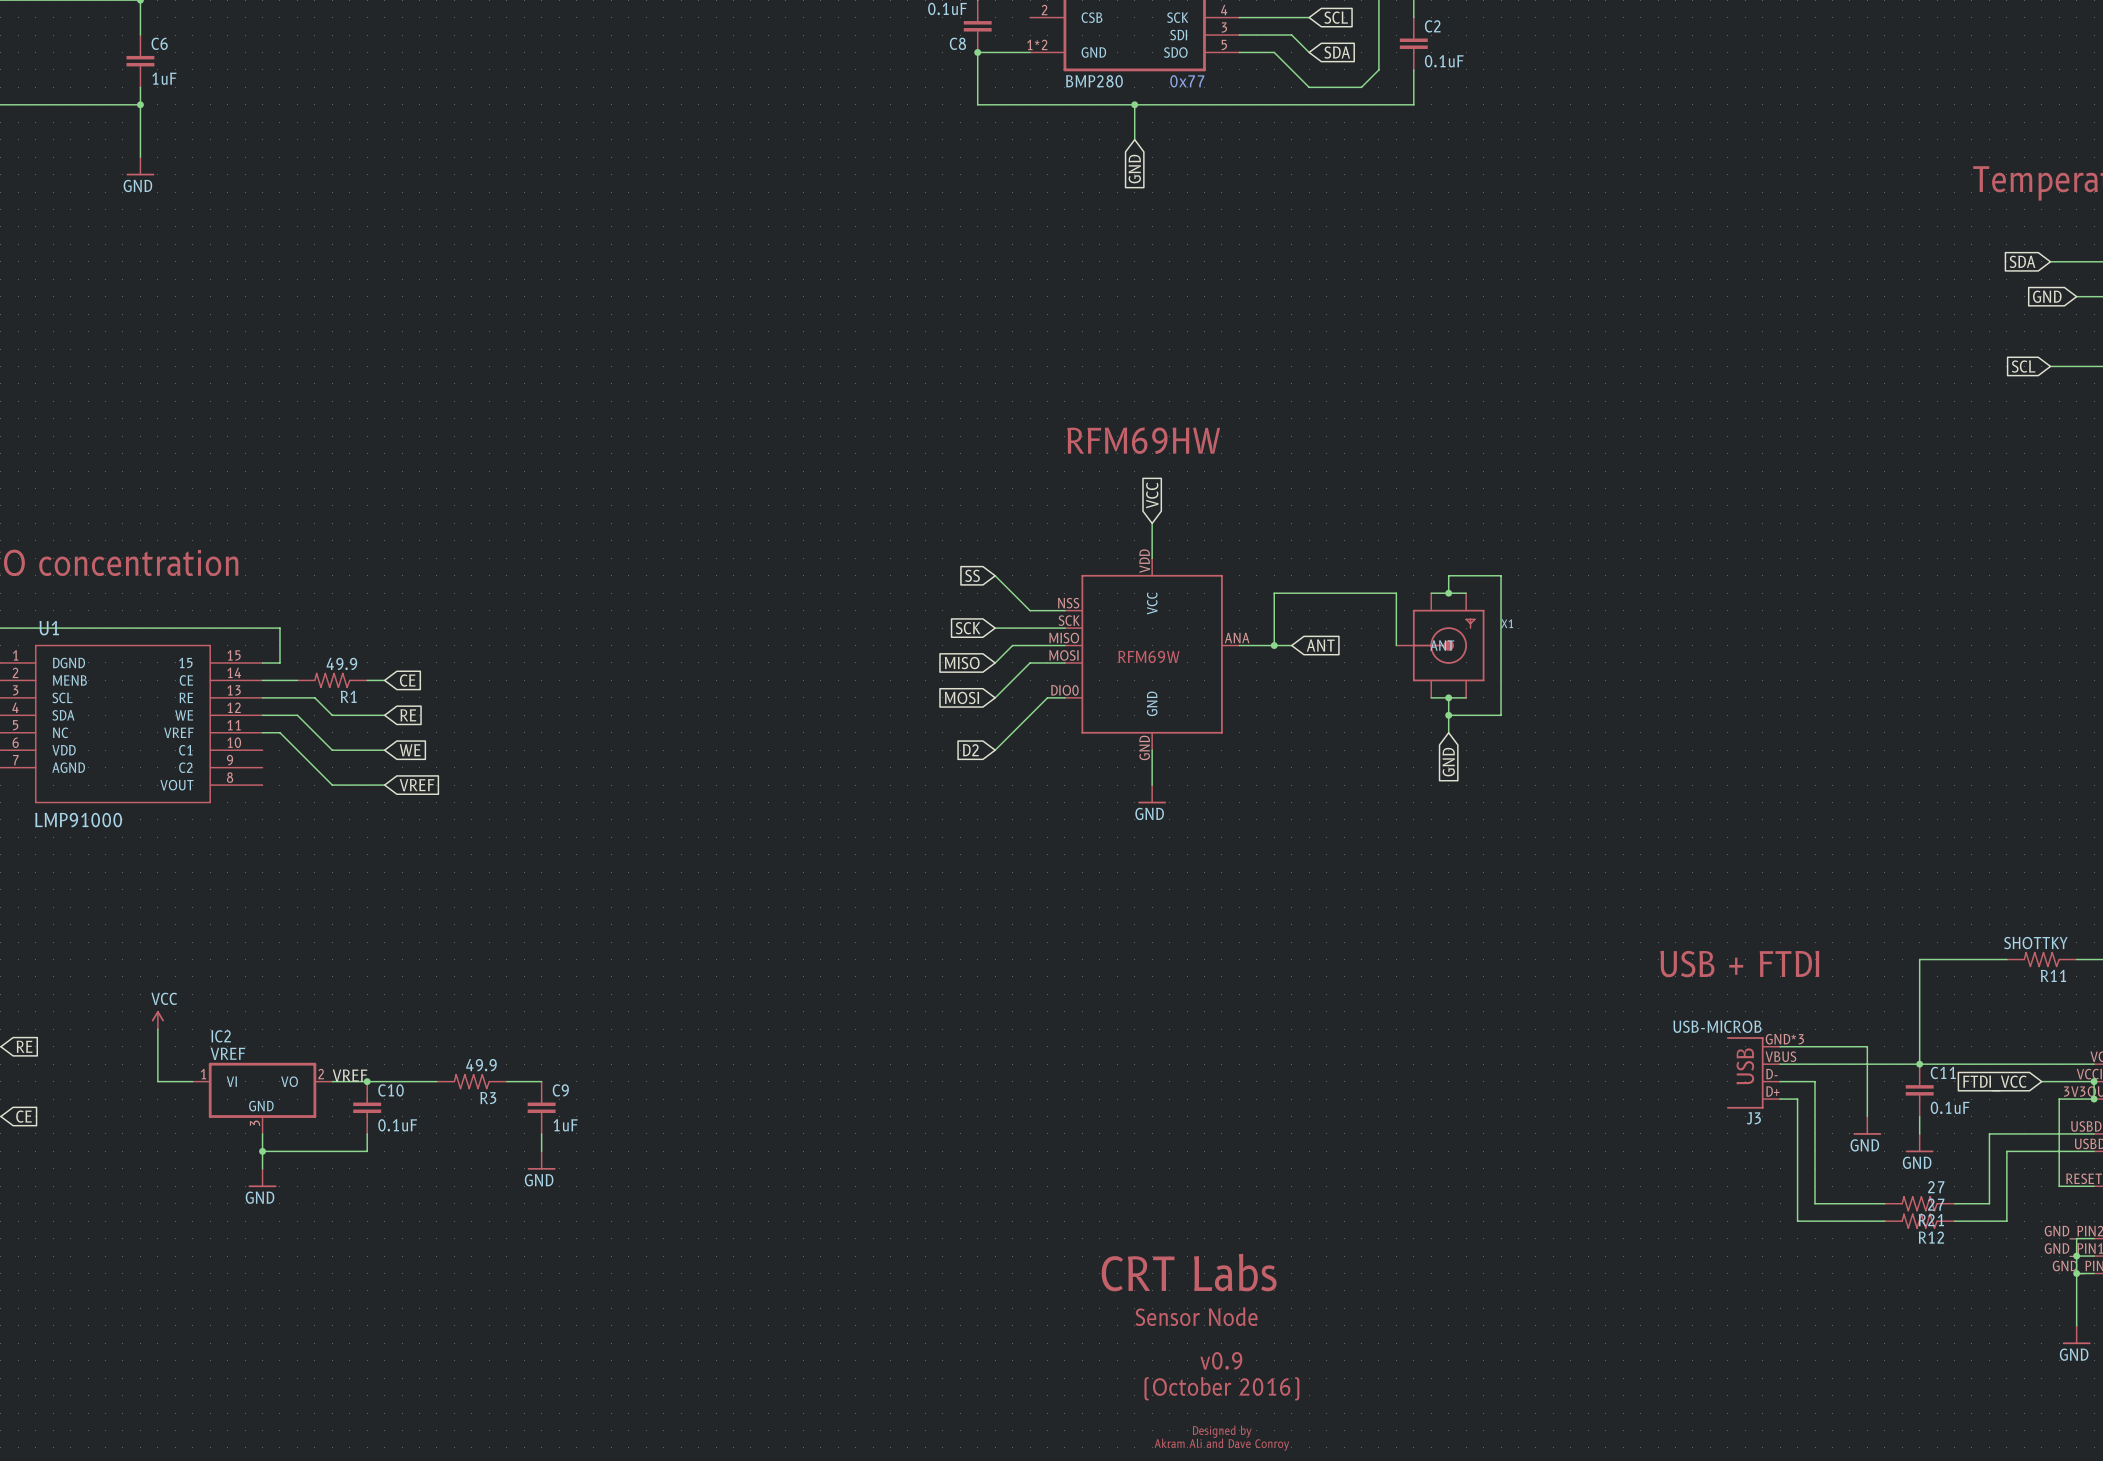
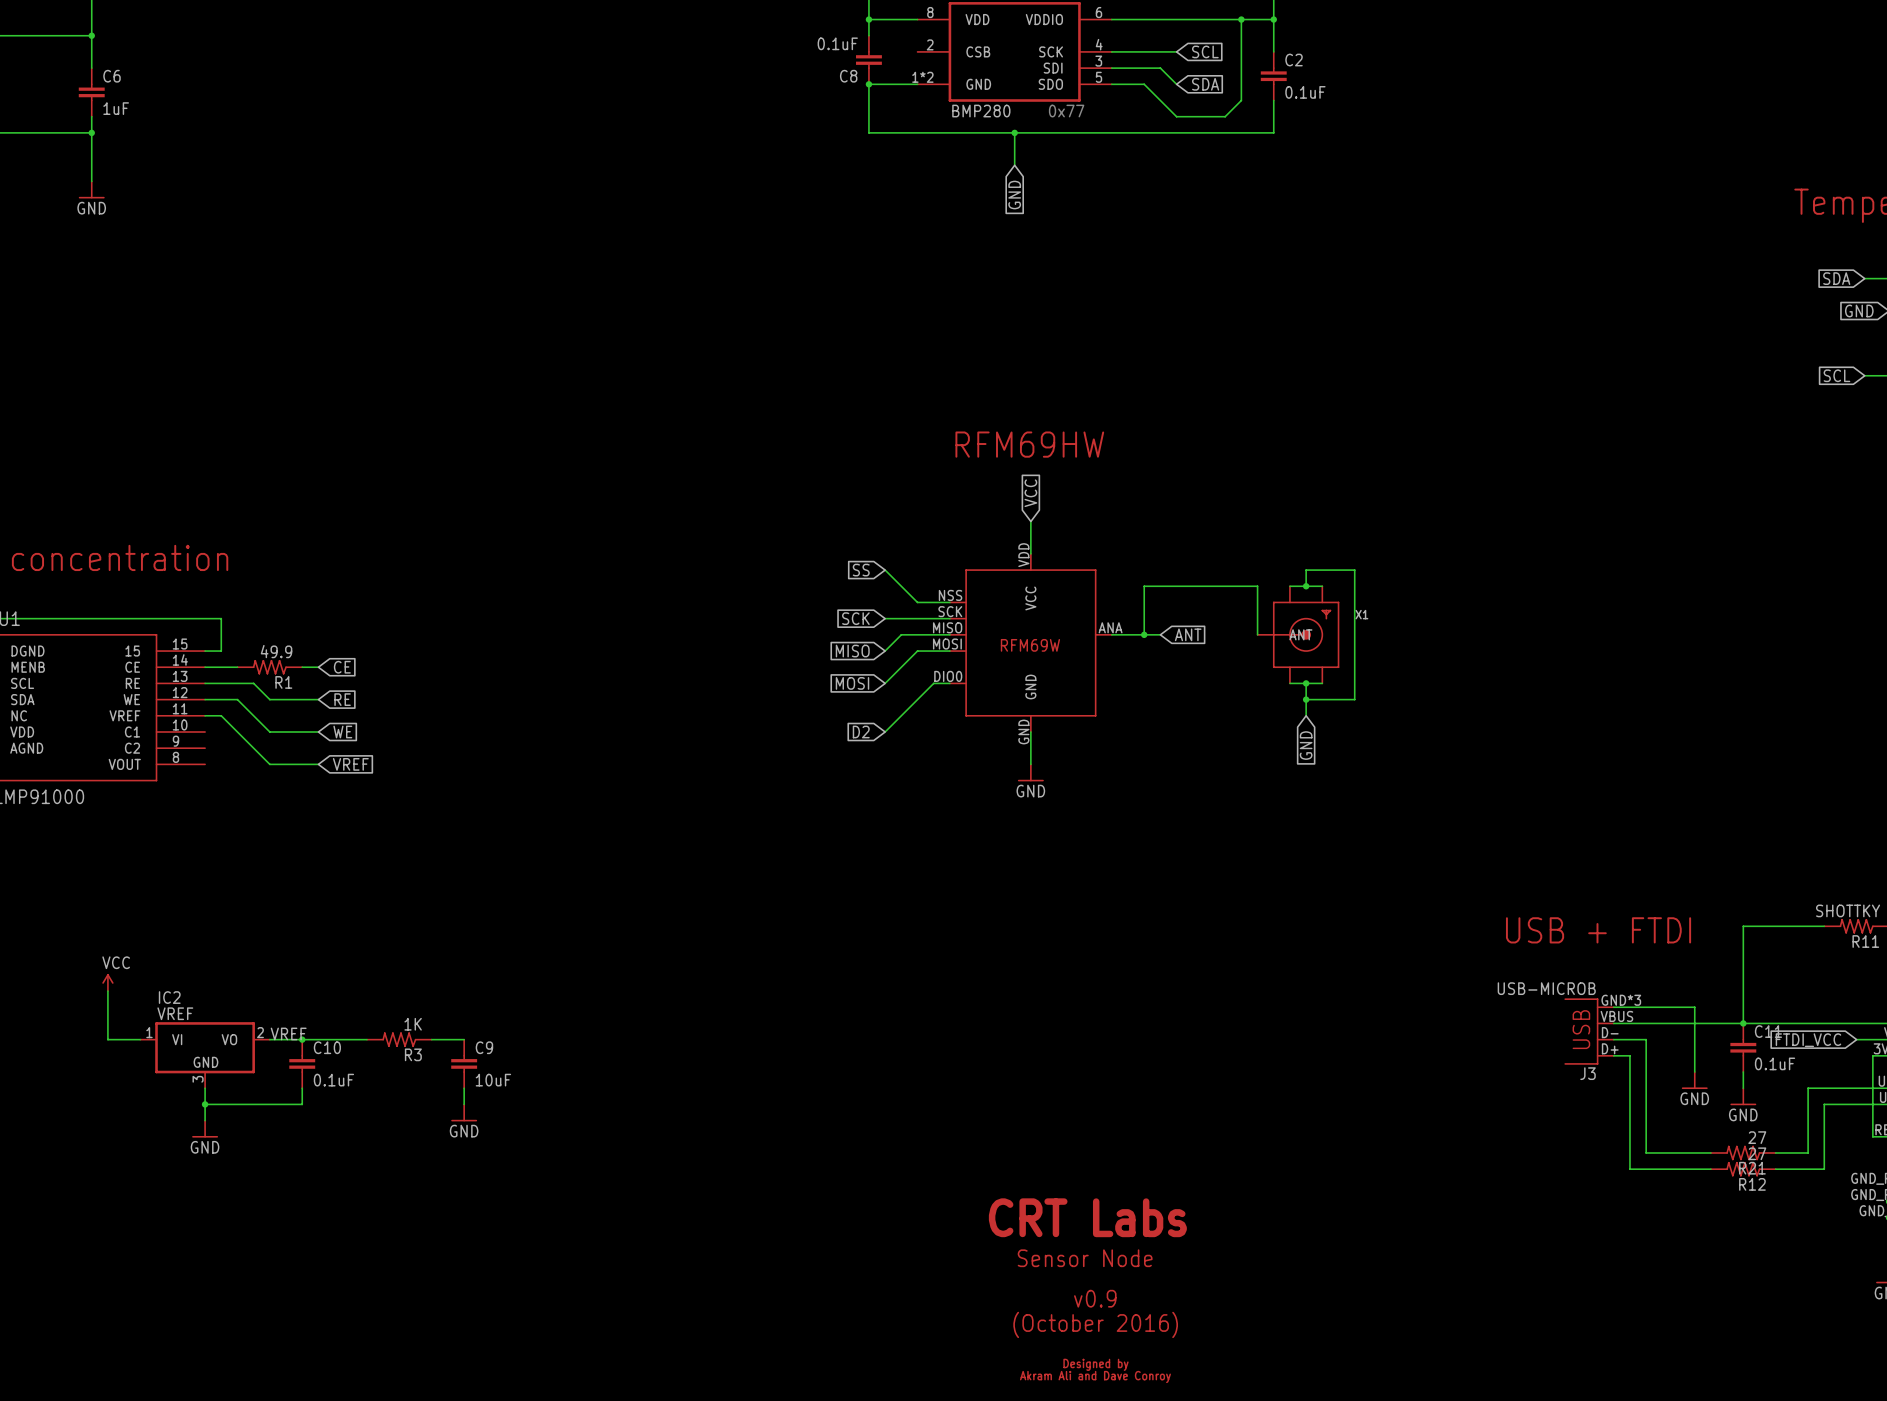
R3 value: 49.9 (481, 1065) -> 1K (413, 1024)
C9 value: 1uF (565, 1125) -> 10uF (493, 1080)

